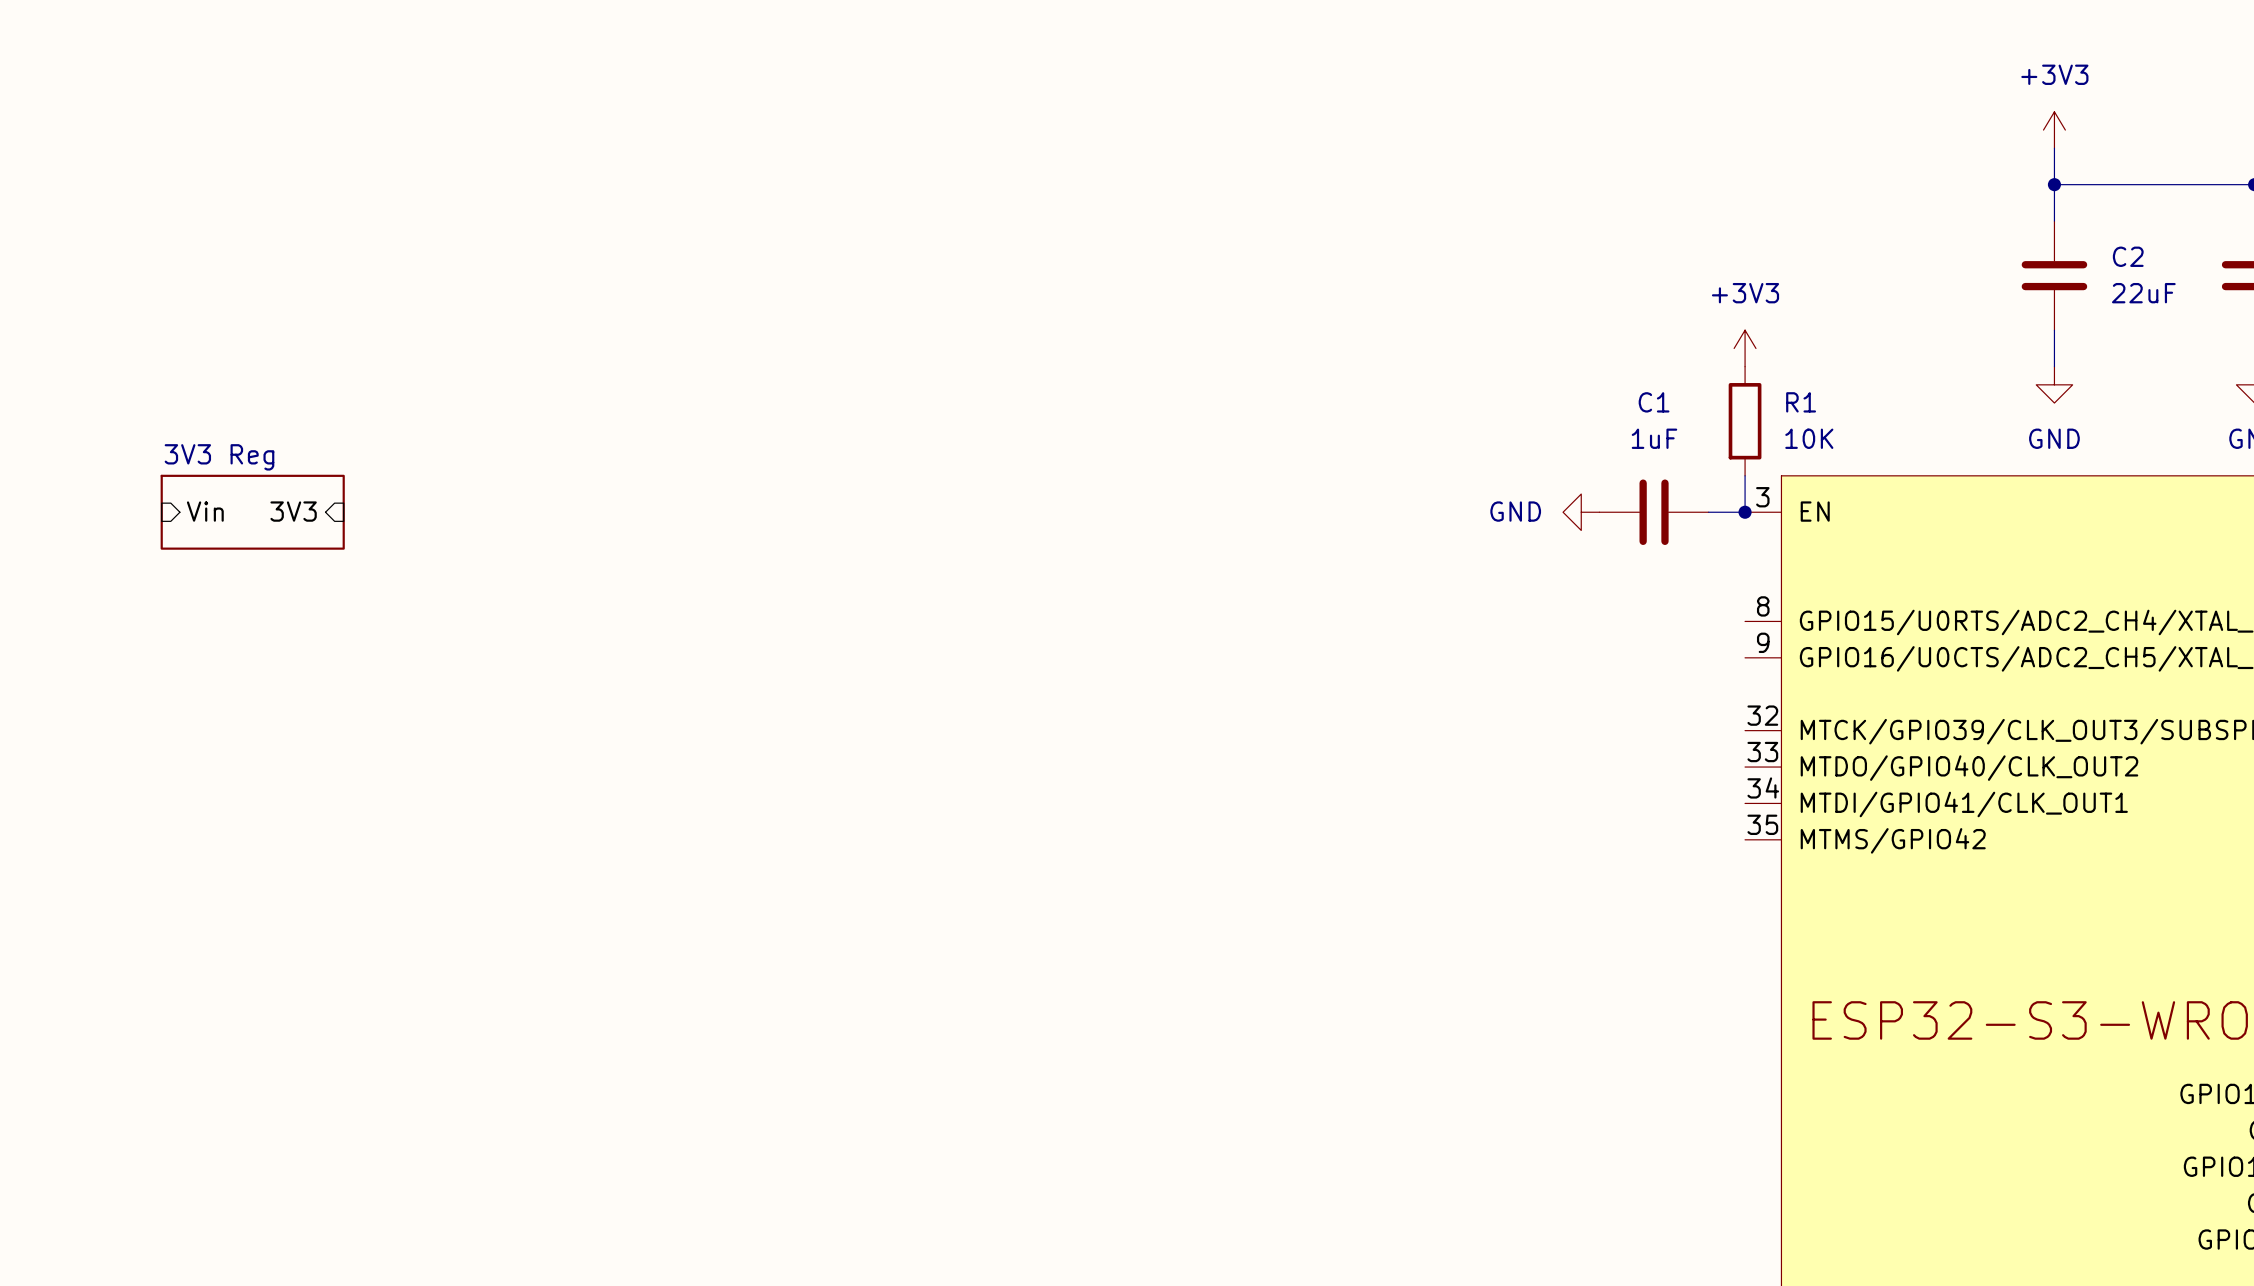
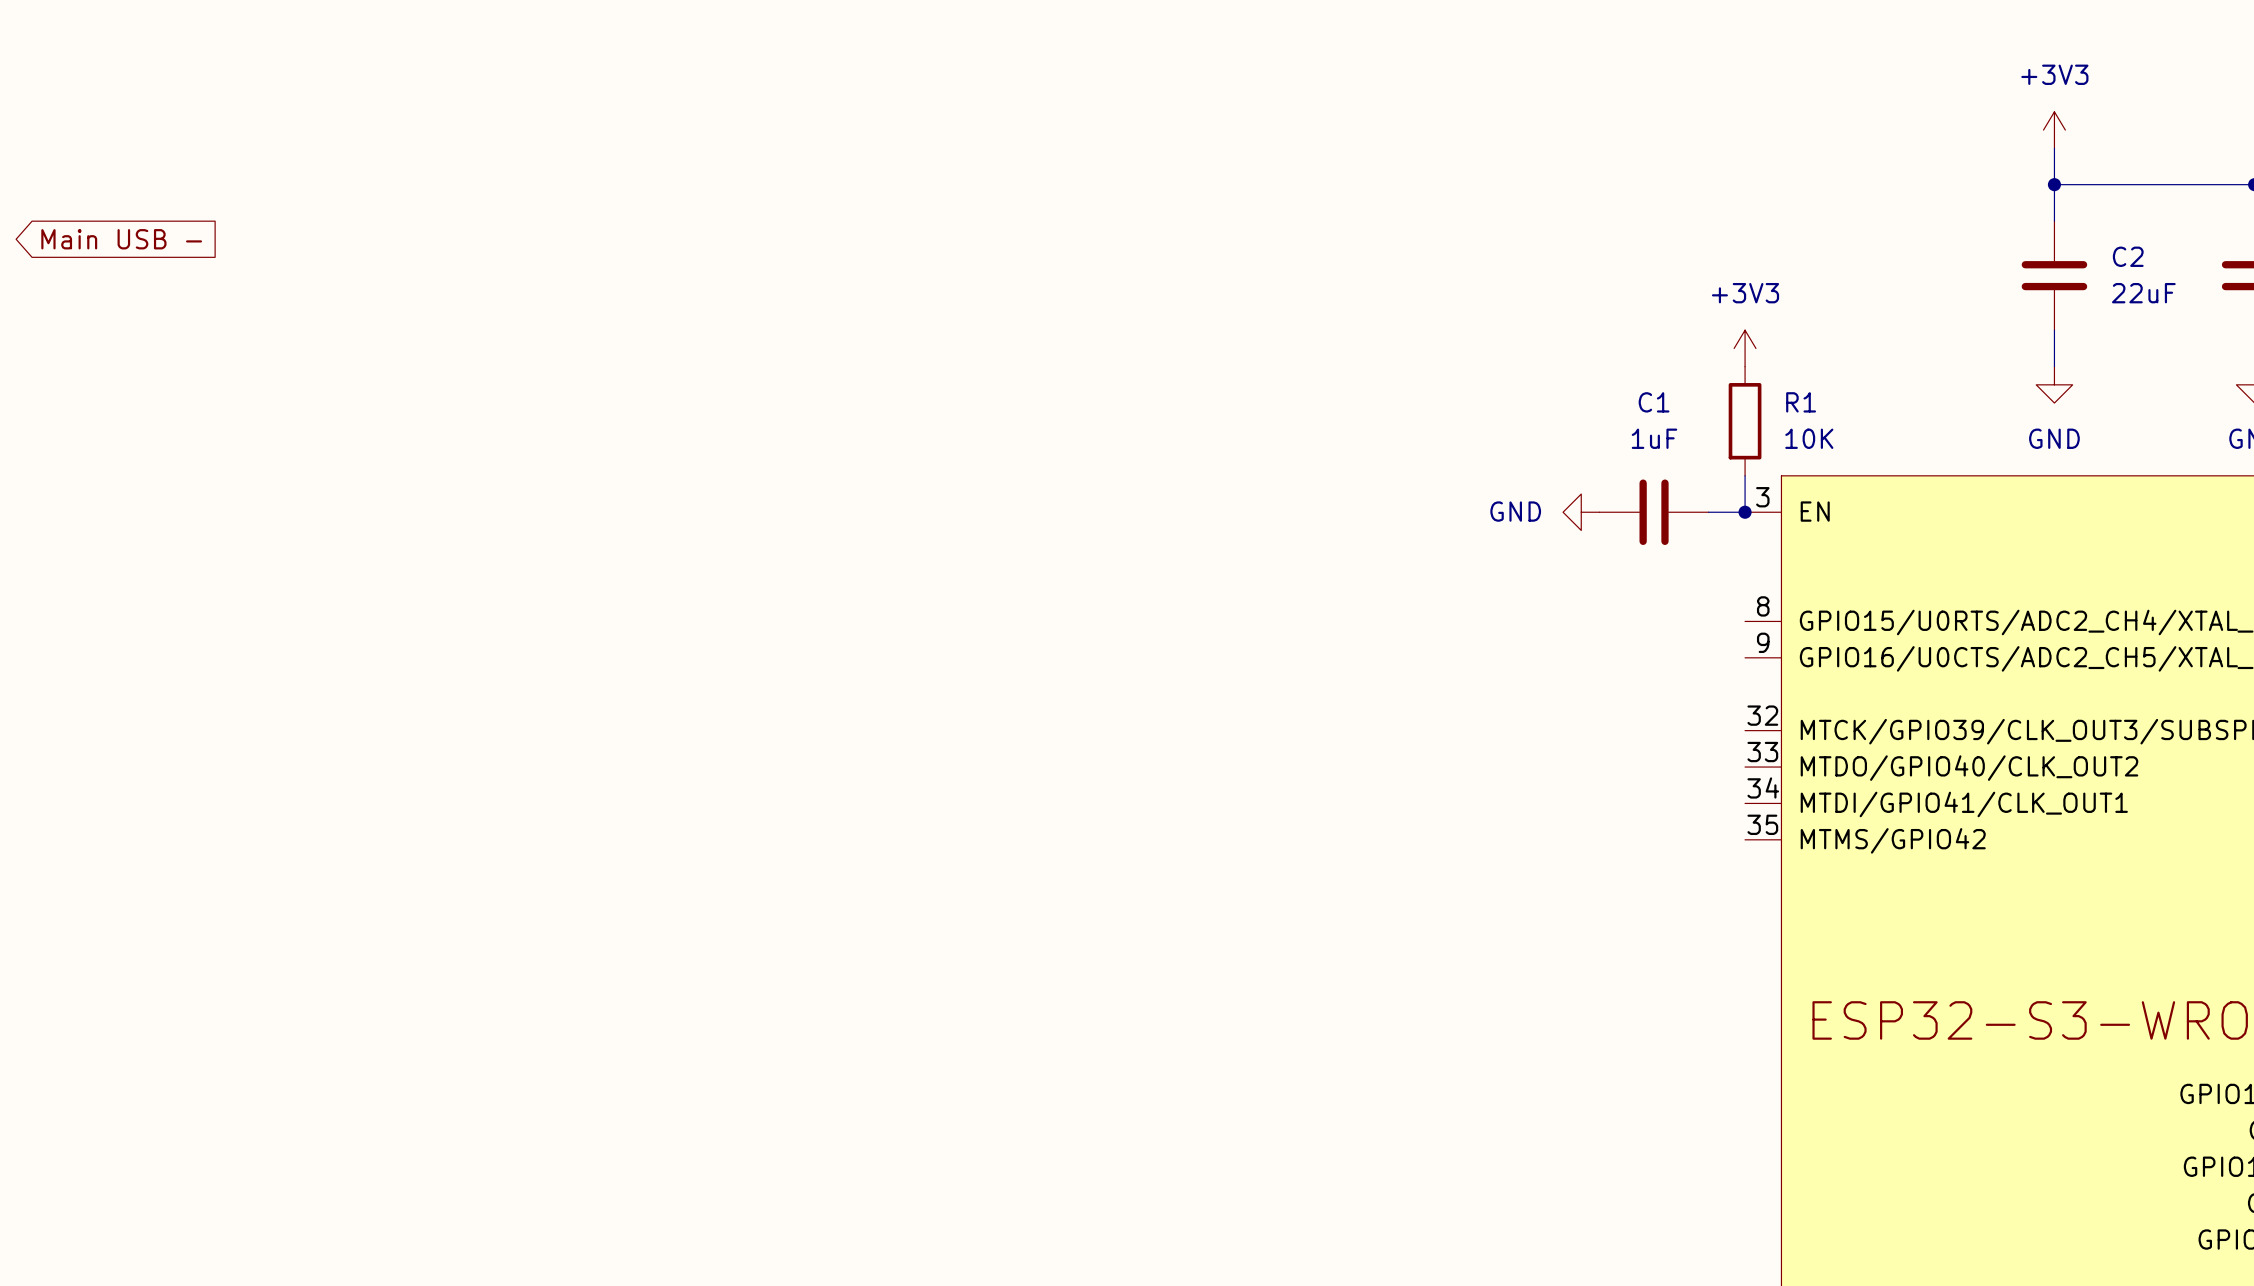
global label: none -> Main USB - (121, 239)
sheet pin: Vin (205, 511) -> none
sheet pin: 3V3 (293, 511) -> none
sheet 3V3 Reg: (252, 512) -> none

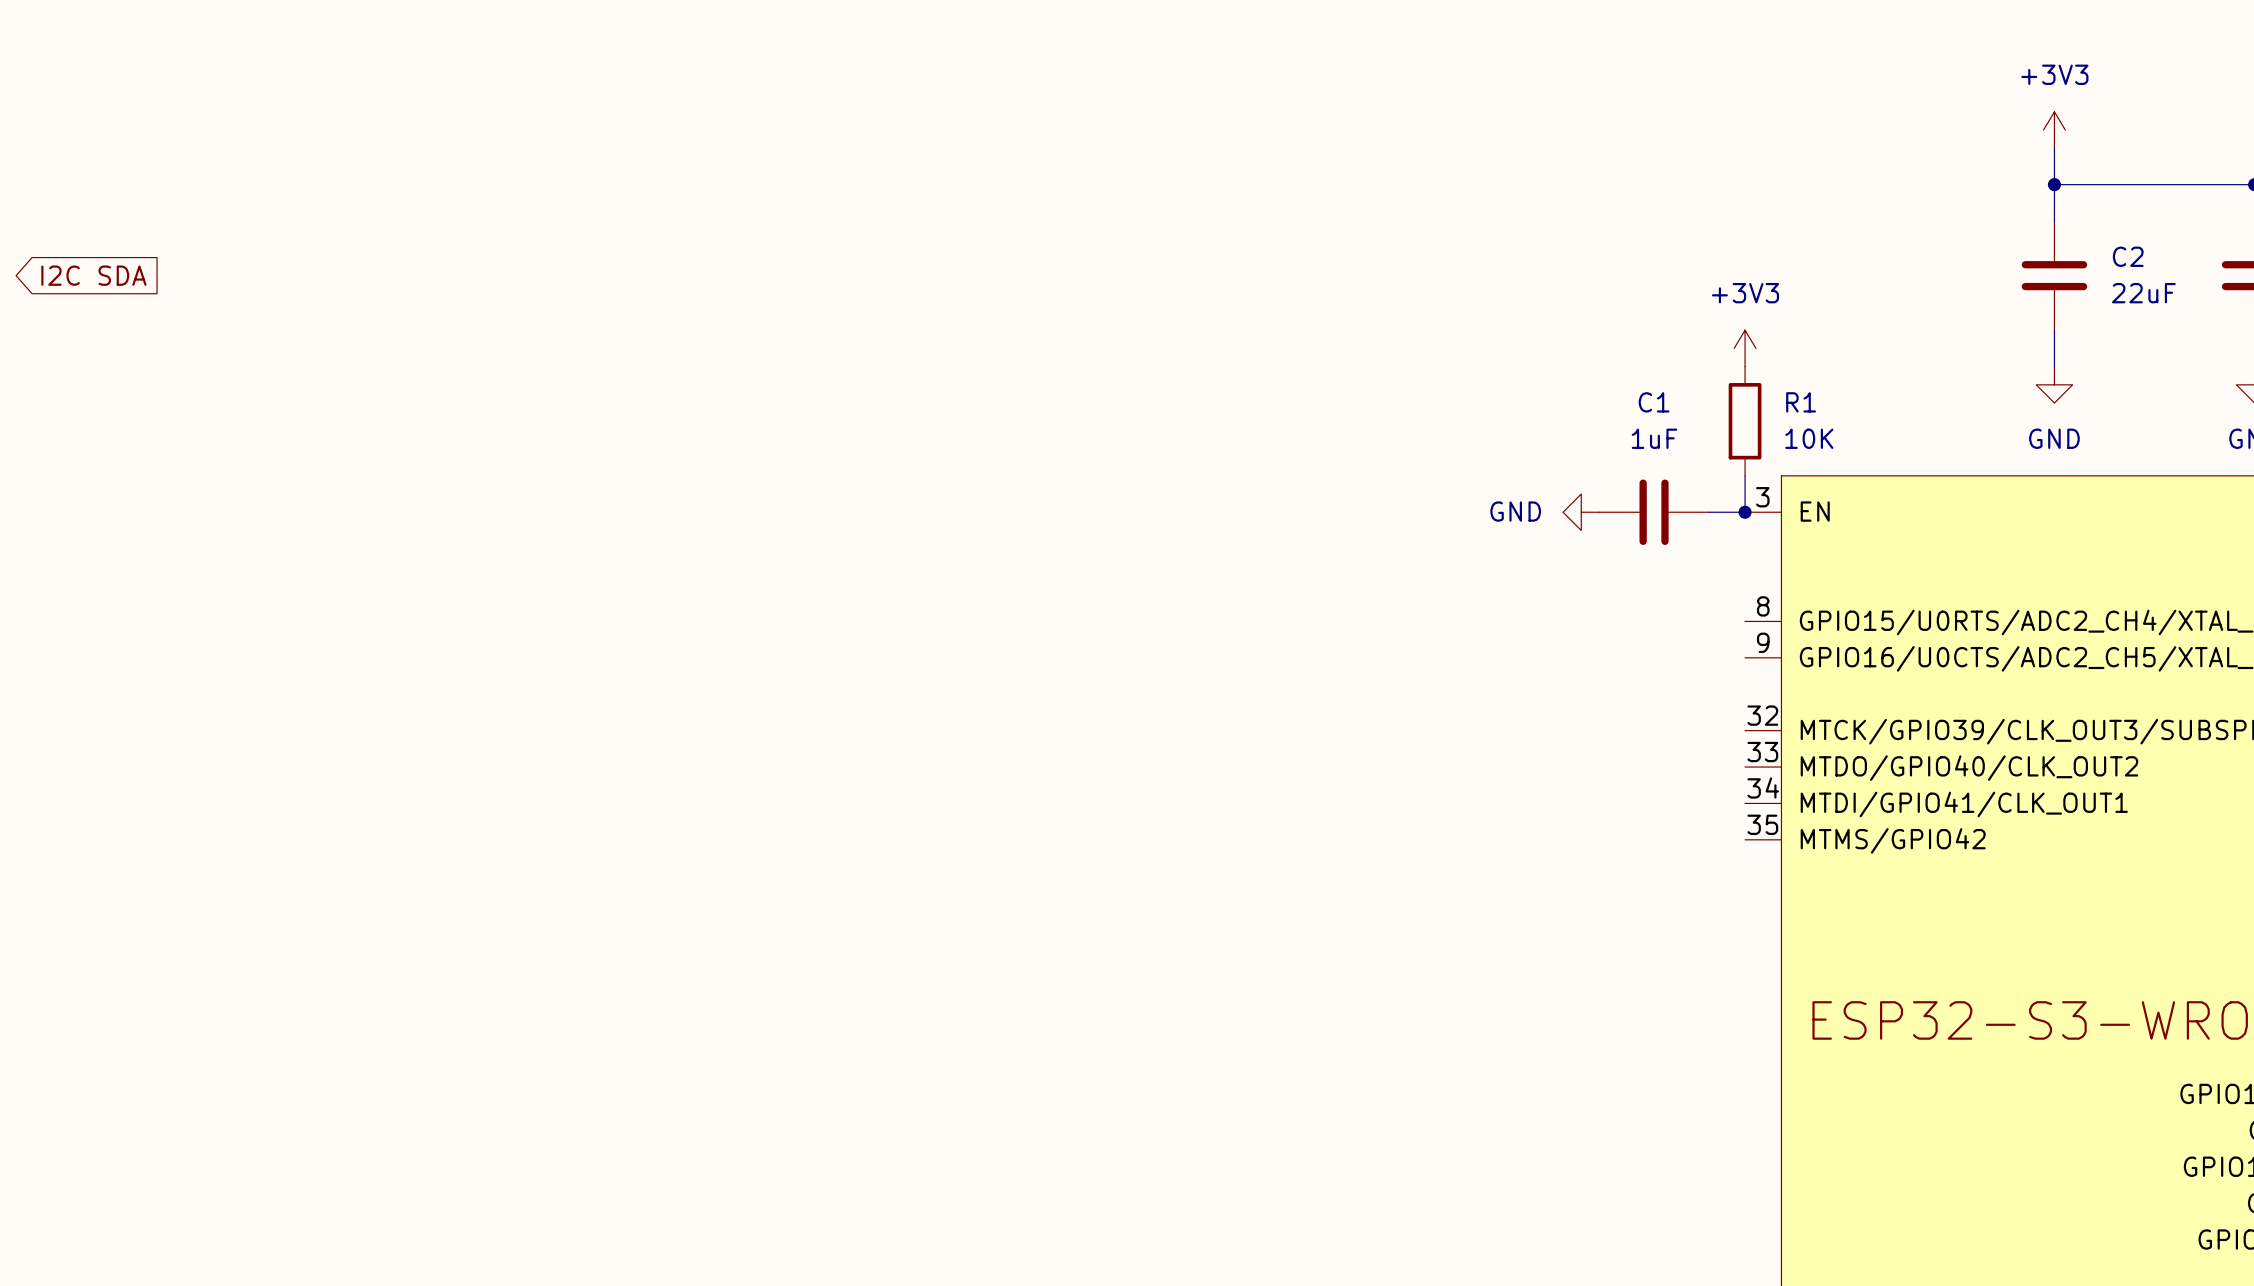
global label: Main USB - (121, 239) -> none
global label: none -> I2C SDA (93, 275)

